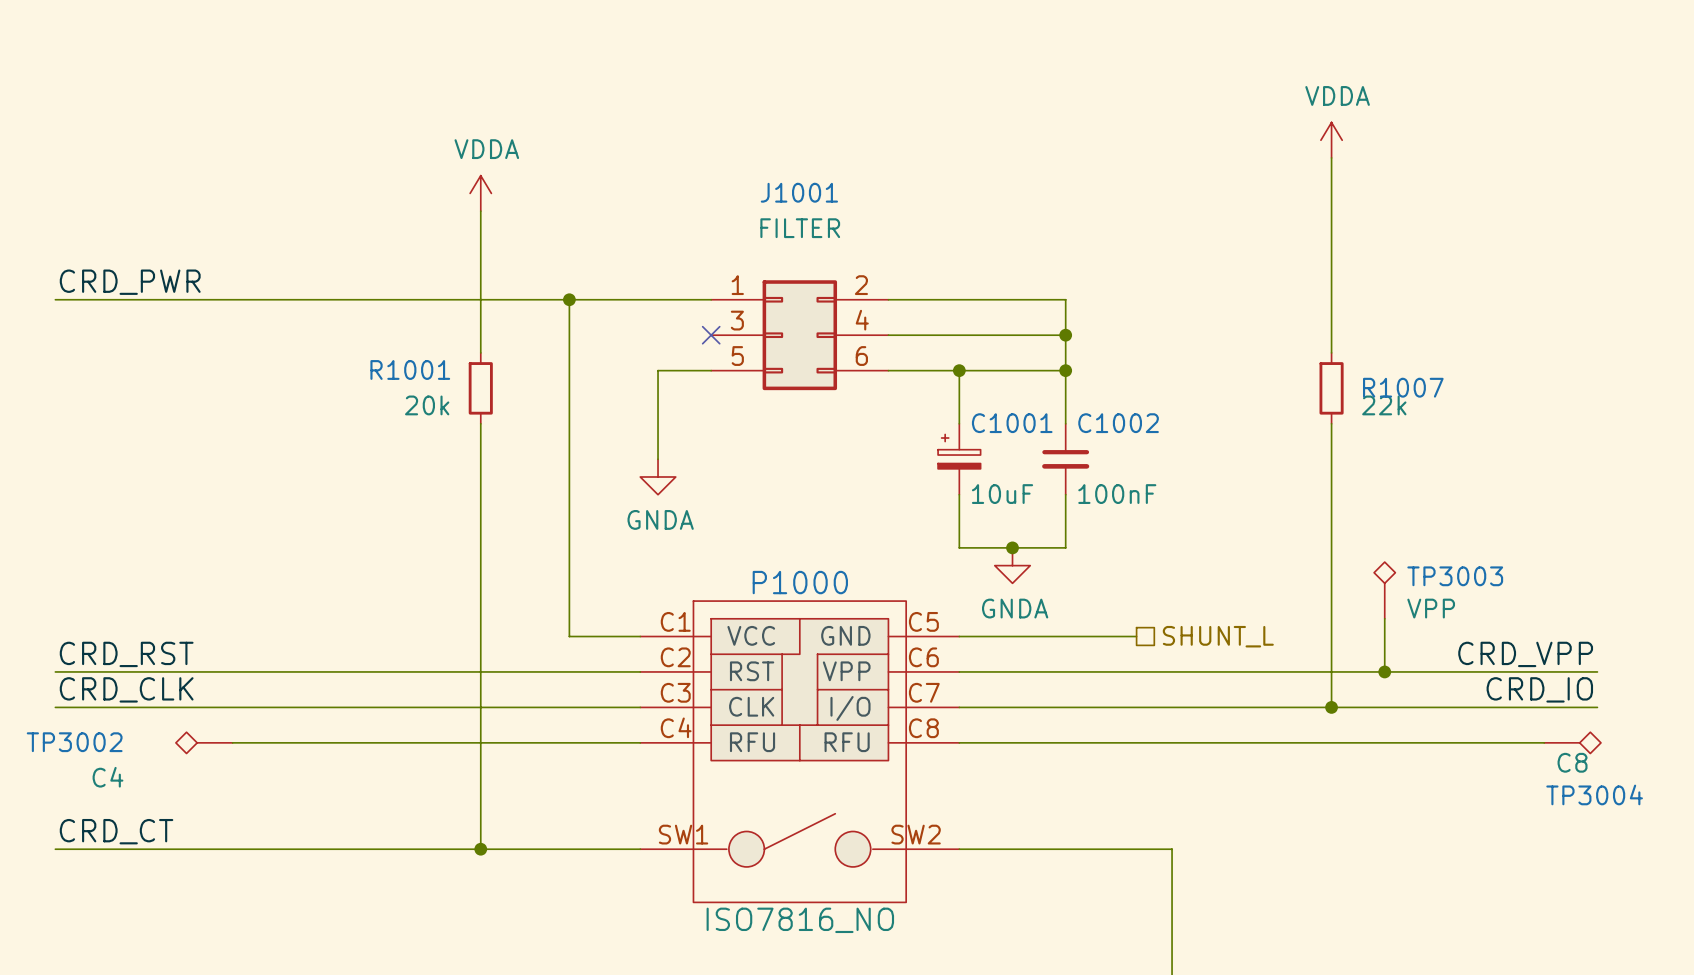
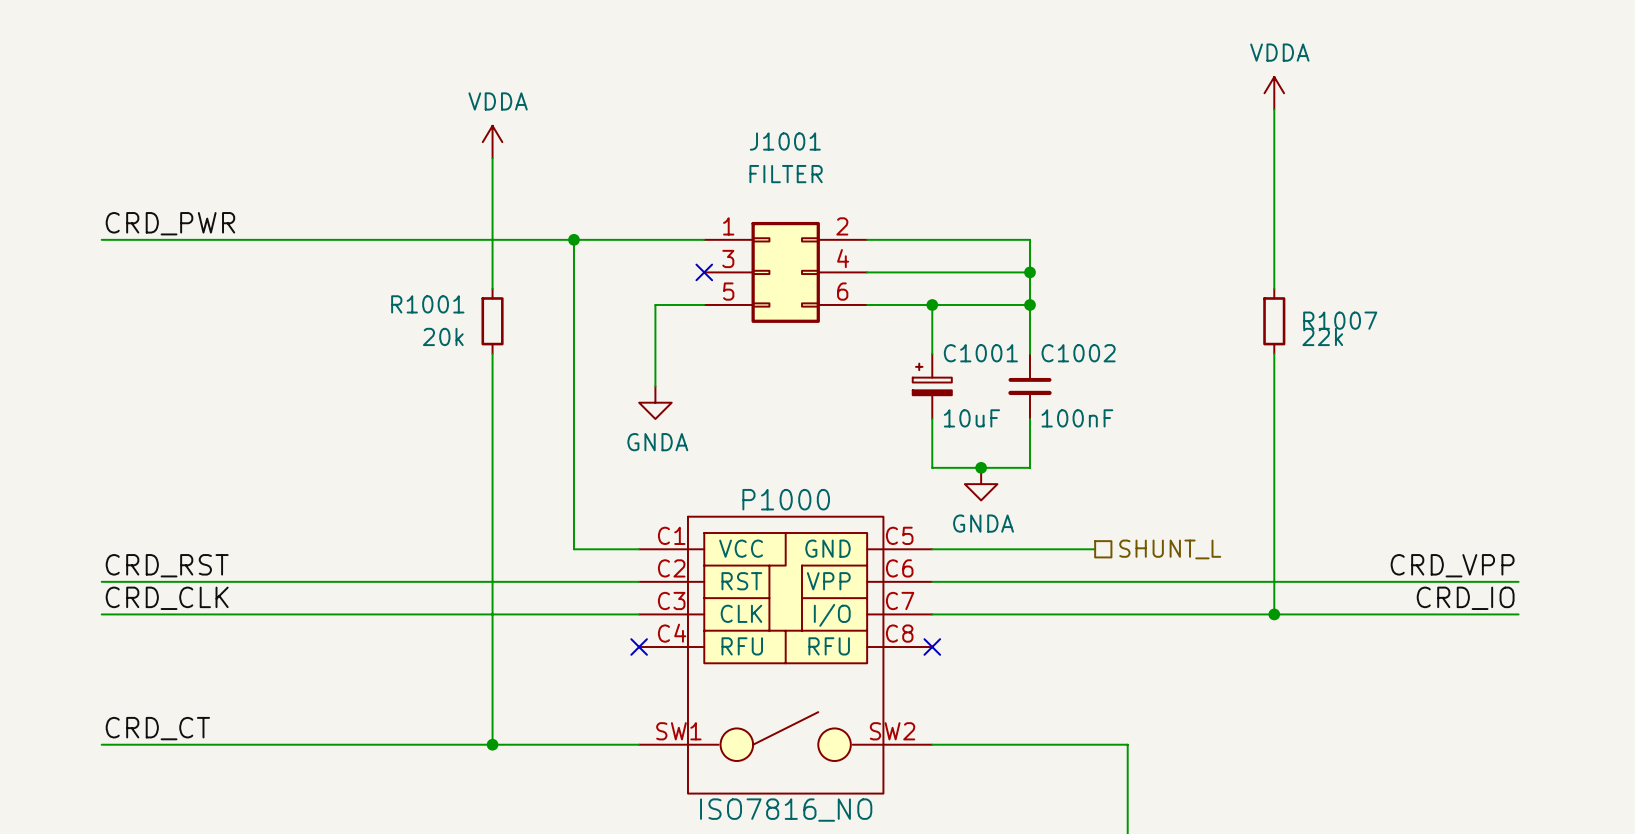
TP3003: VPP (1384, 590) -> none
wire: (1384, 618) (1384, 671) -> none
junction: (1384, 671) -> none
TP3002: C4 (204, 742) -> none
wire: (232, 742) (640, 742) -> none
no-connect mark: none -> (639, 647)
wire: (959, 742) (1544, 742) -> none
no-connect mark: none -> (932, 647)
TP3004: C8 (1572, 742) -> none

